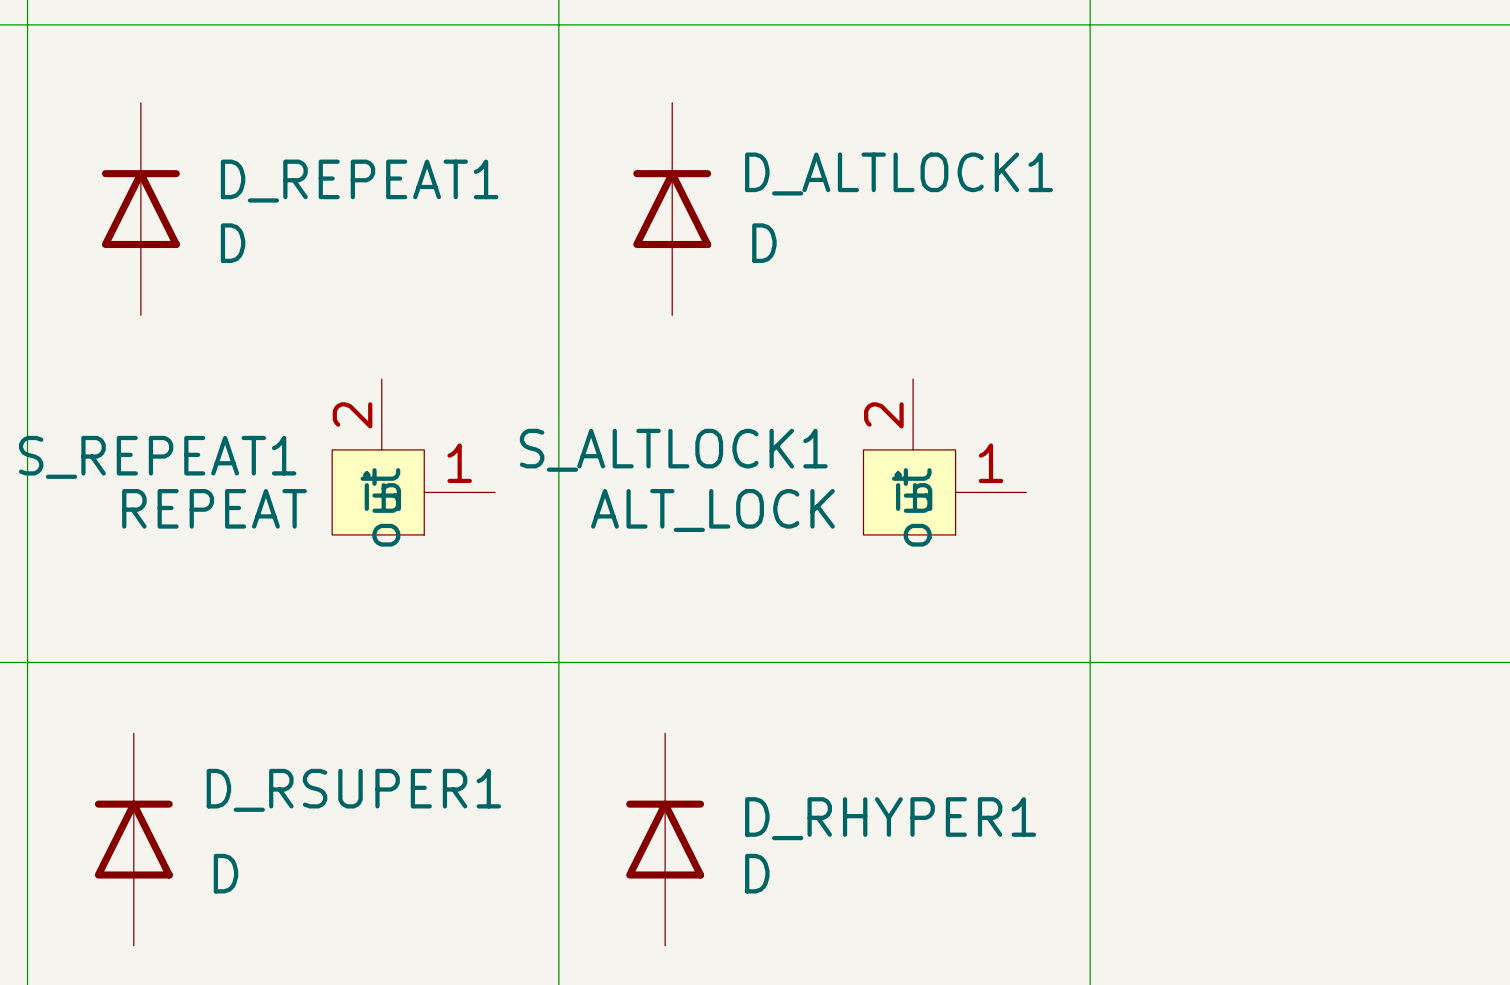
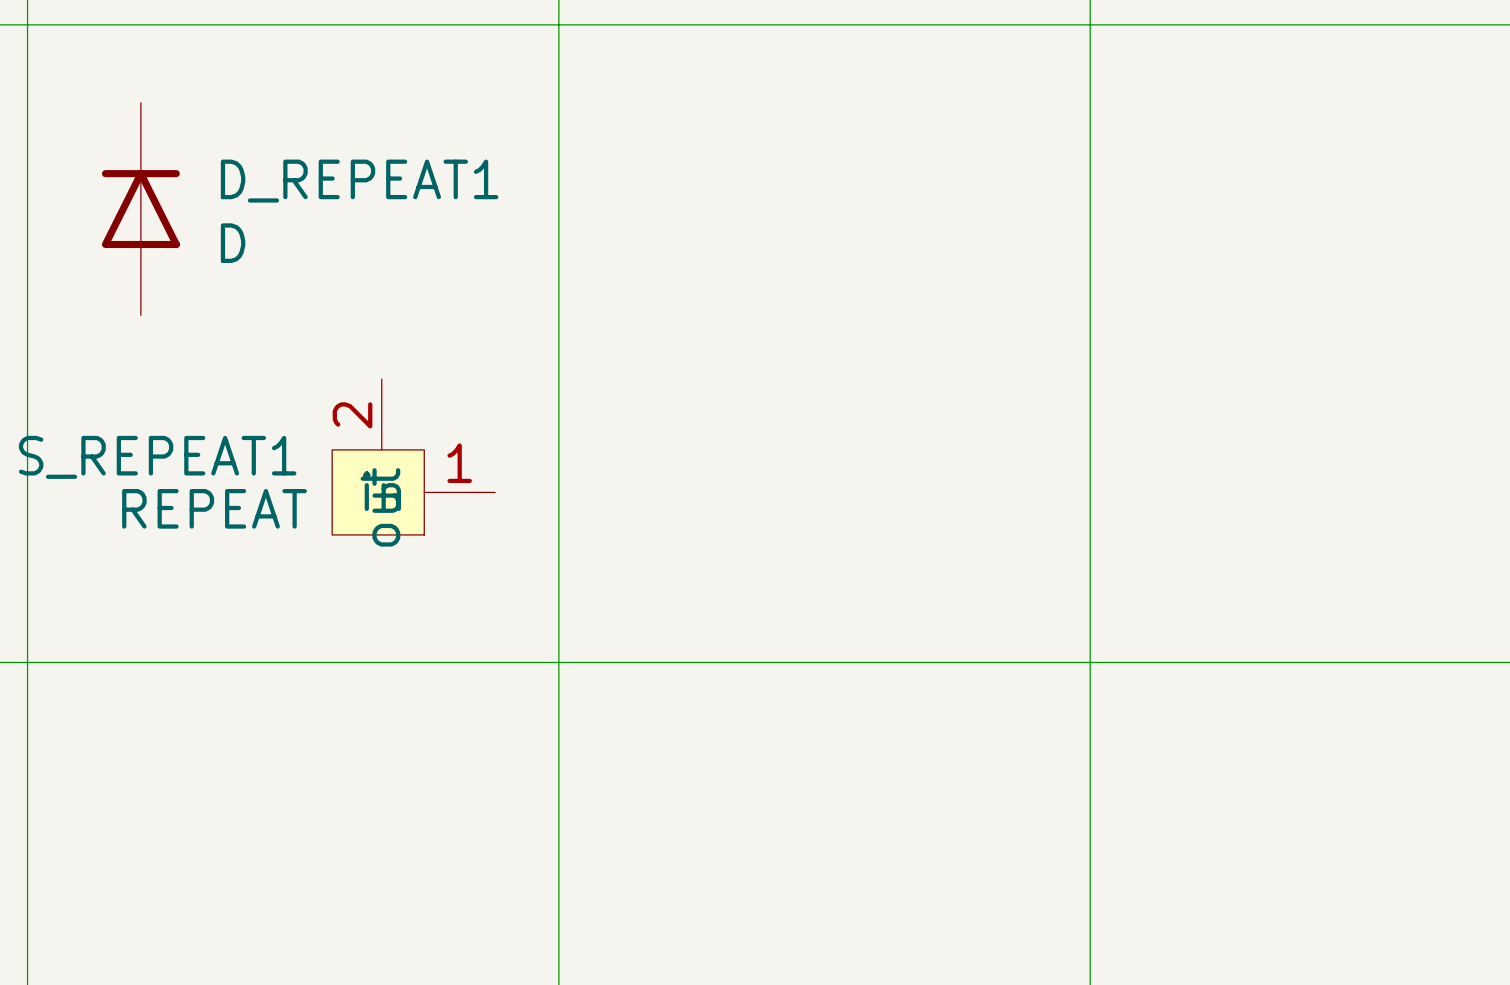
D_ALTLOCK1: D (672, 209) -> none
S_ALTLOCK1: ALT_LOCK (944, 457) -> none
D_RSUPER1: D (133, 839) -> none
D_RHYPER1: D (665, 839) -> none

